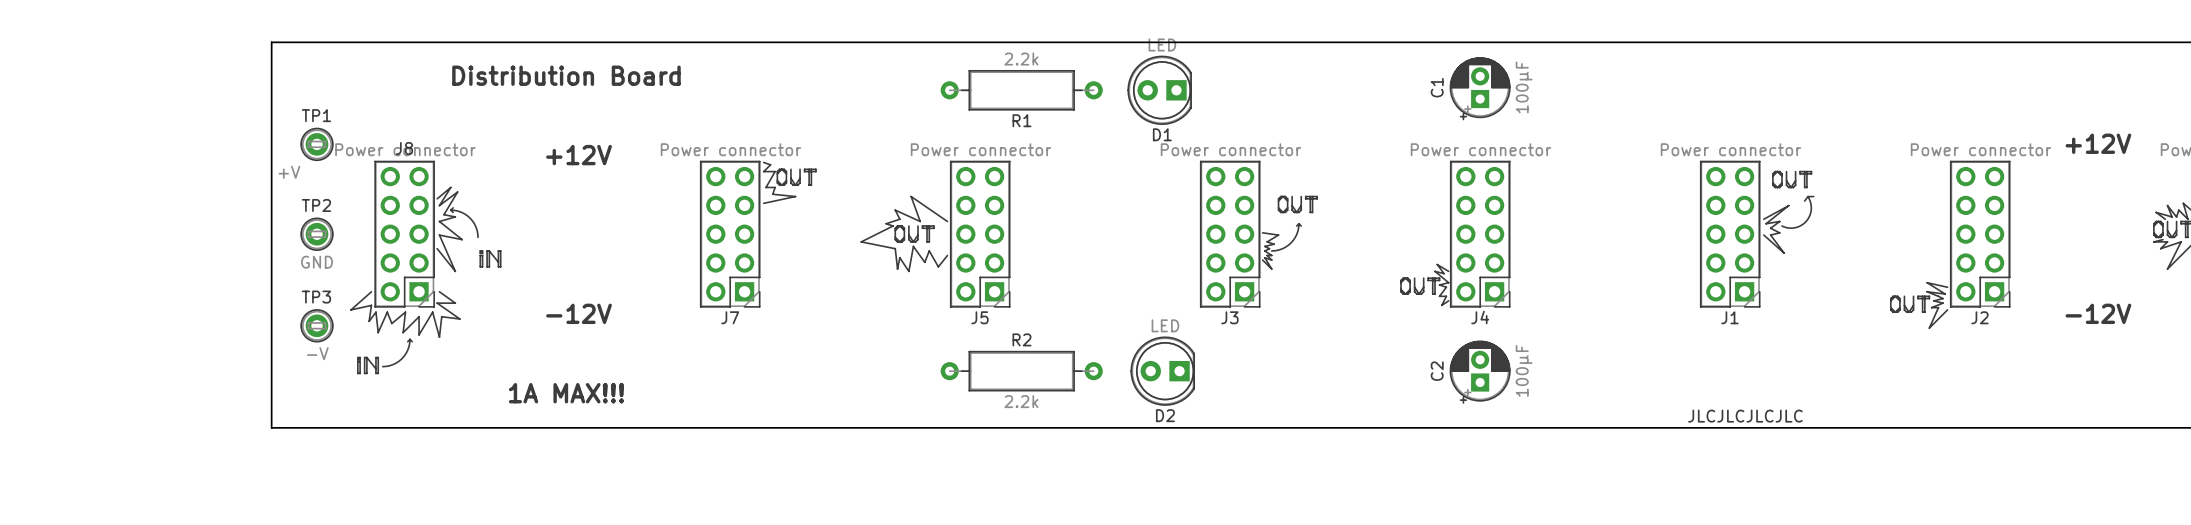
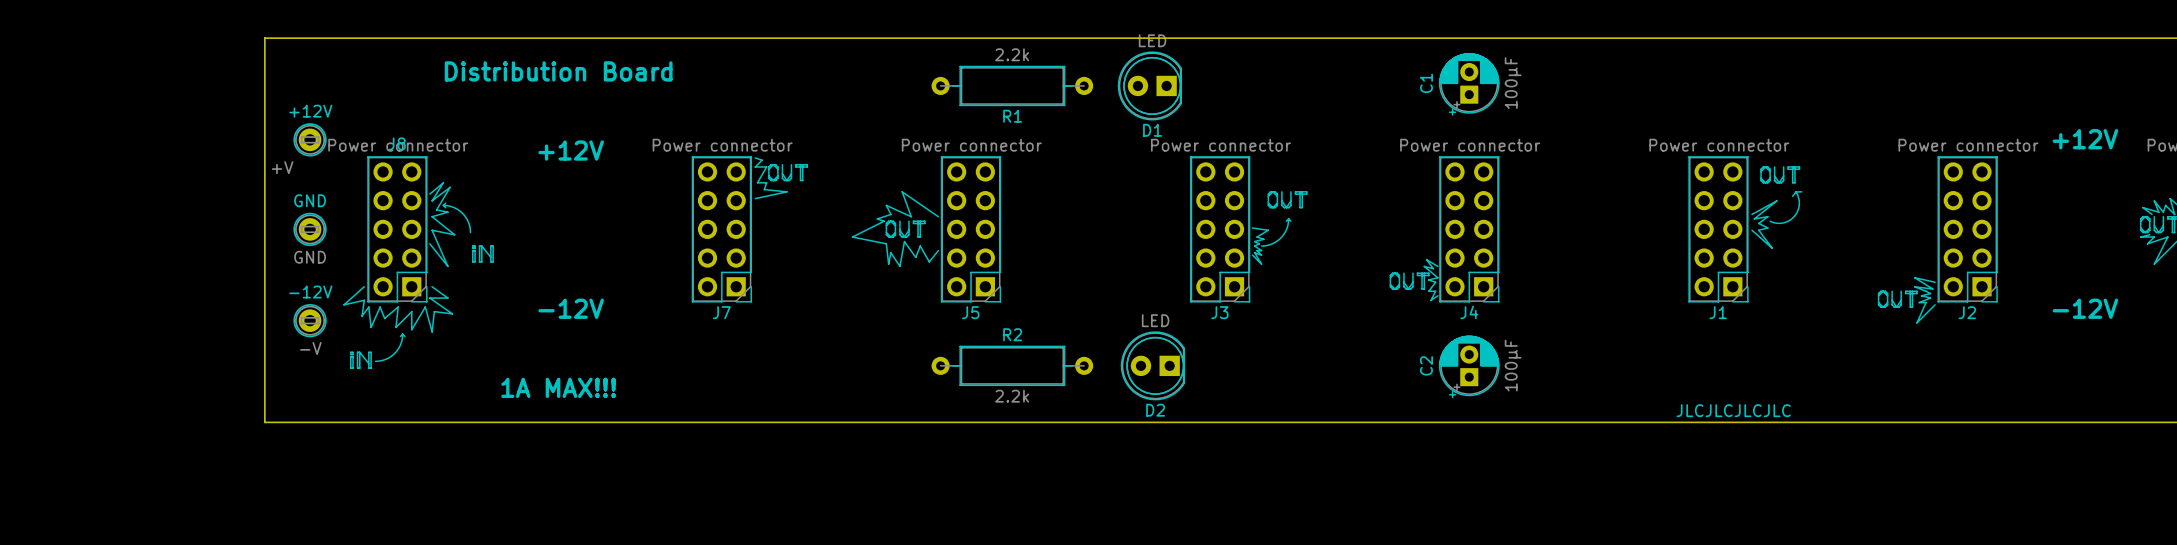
TP1 name: TP1 (316, 115) -> +12V (310, 111)
TP2 name: TP2 (316, 205) -> GND (310, 200)
TP3 name: TP3 (316, 297) -> -12V (310, 291)

